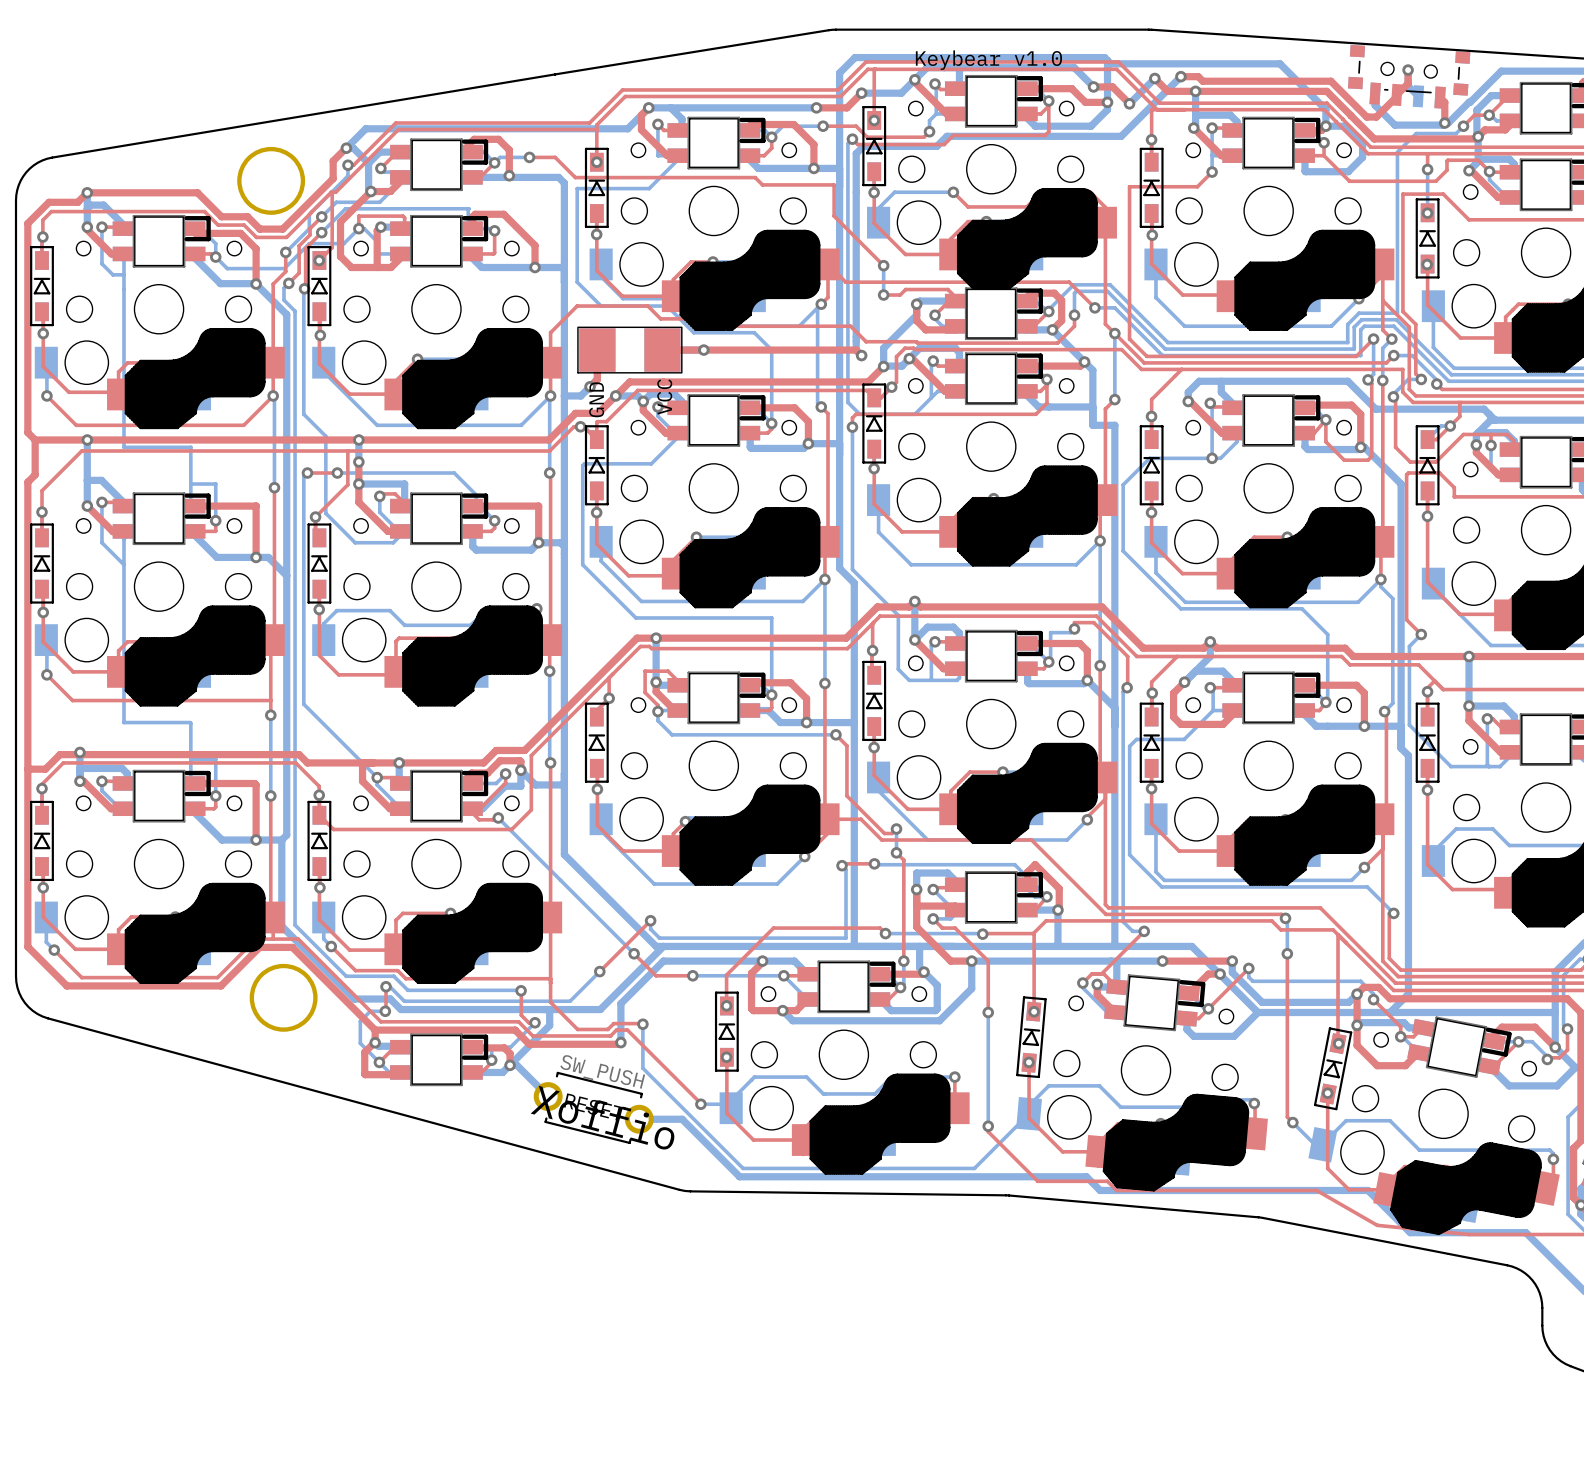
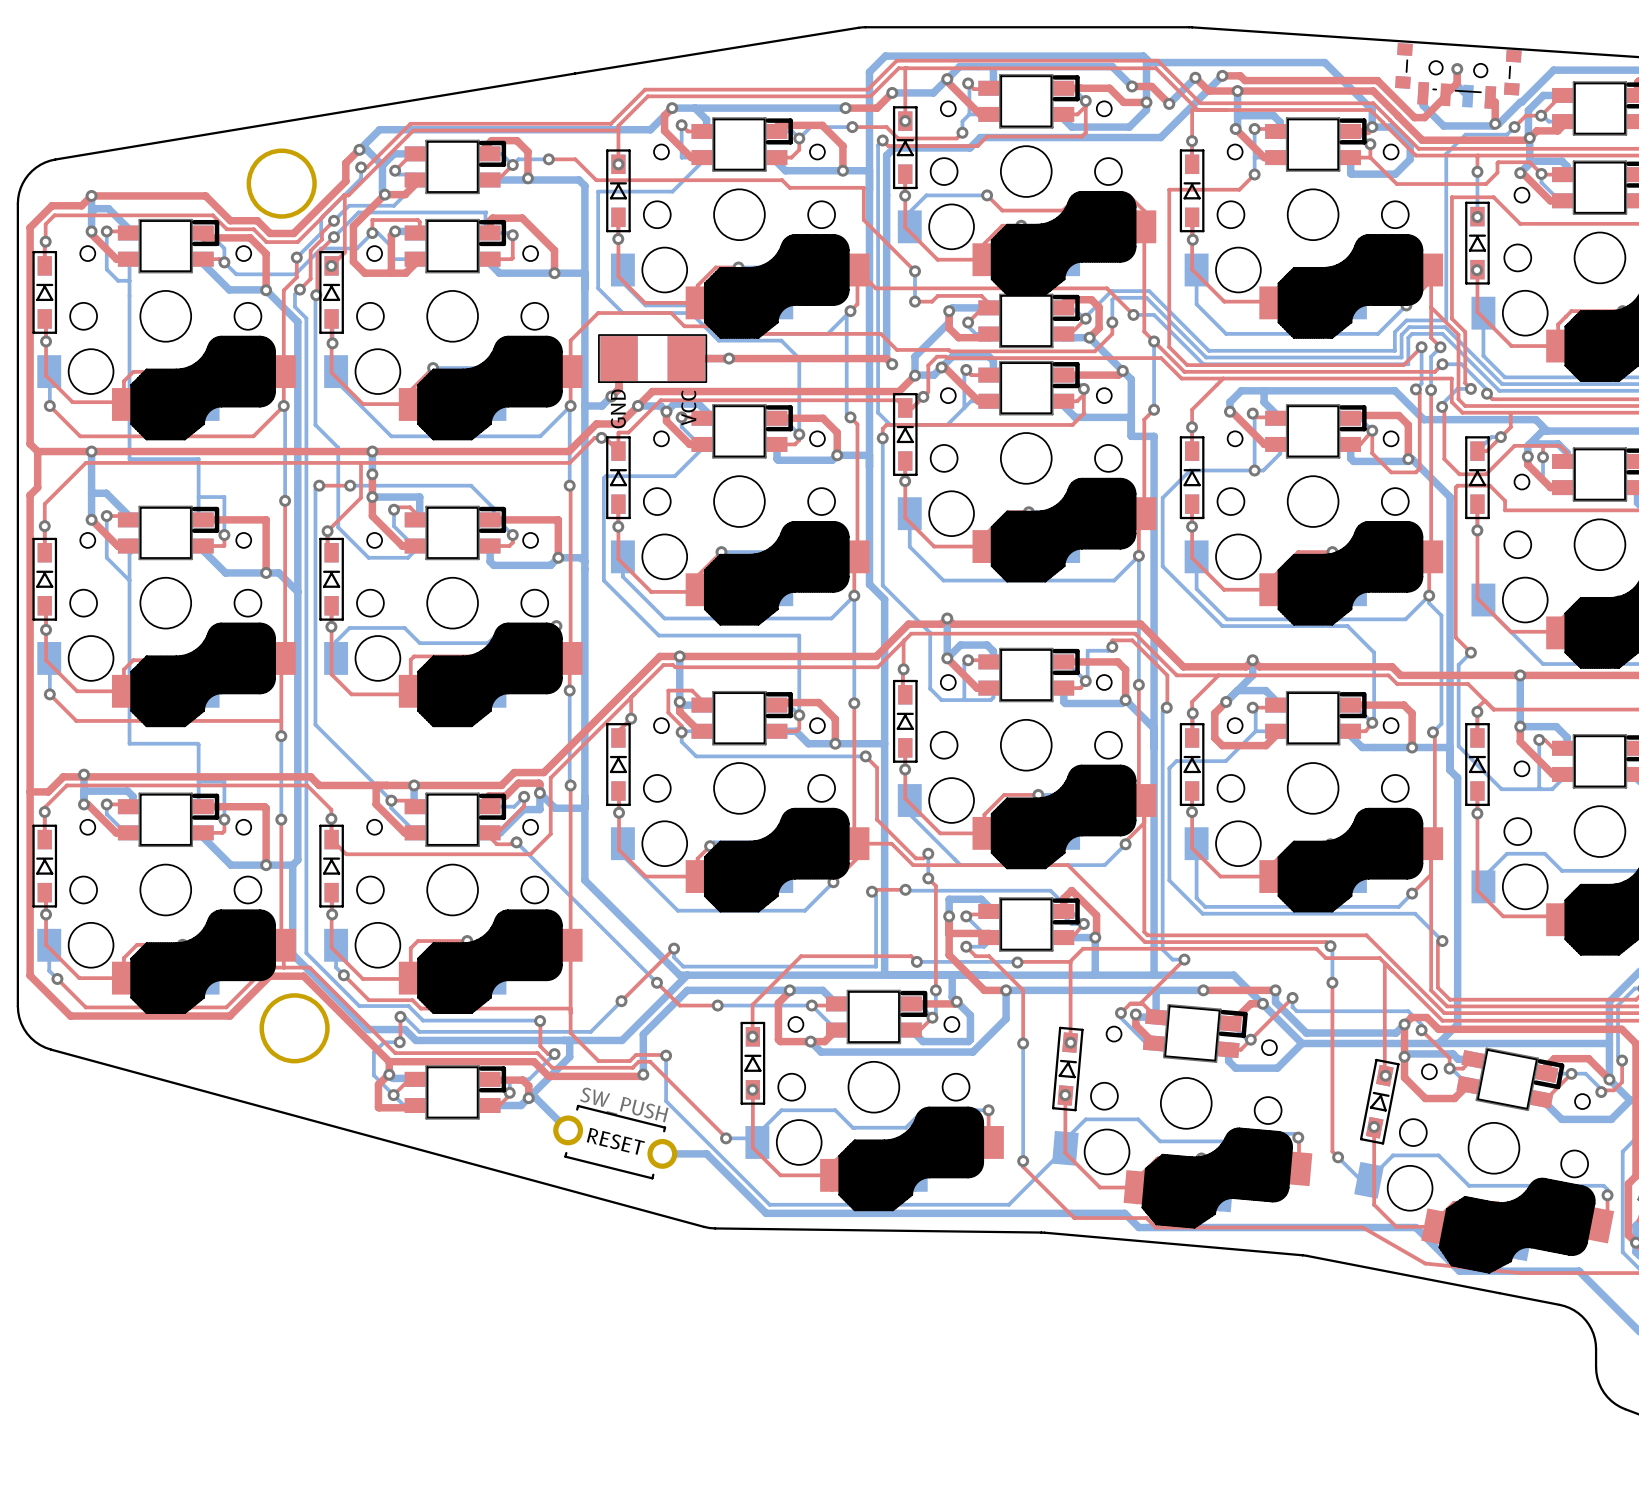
text: Keybear v1.0 (988, 60) -> none
text: Xoffio (602, 1117) -> none

